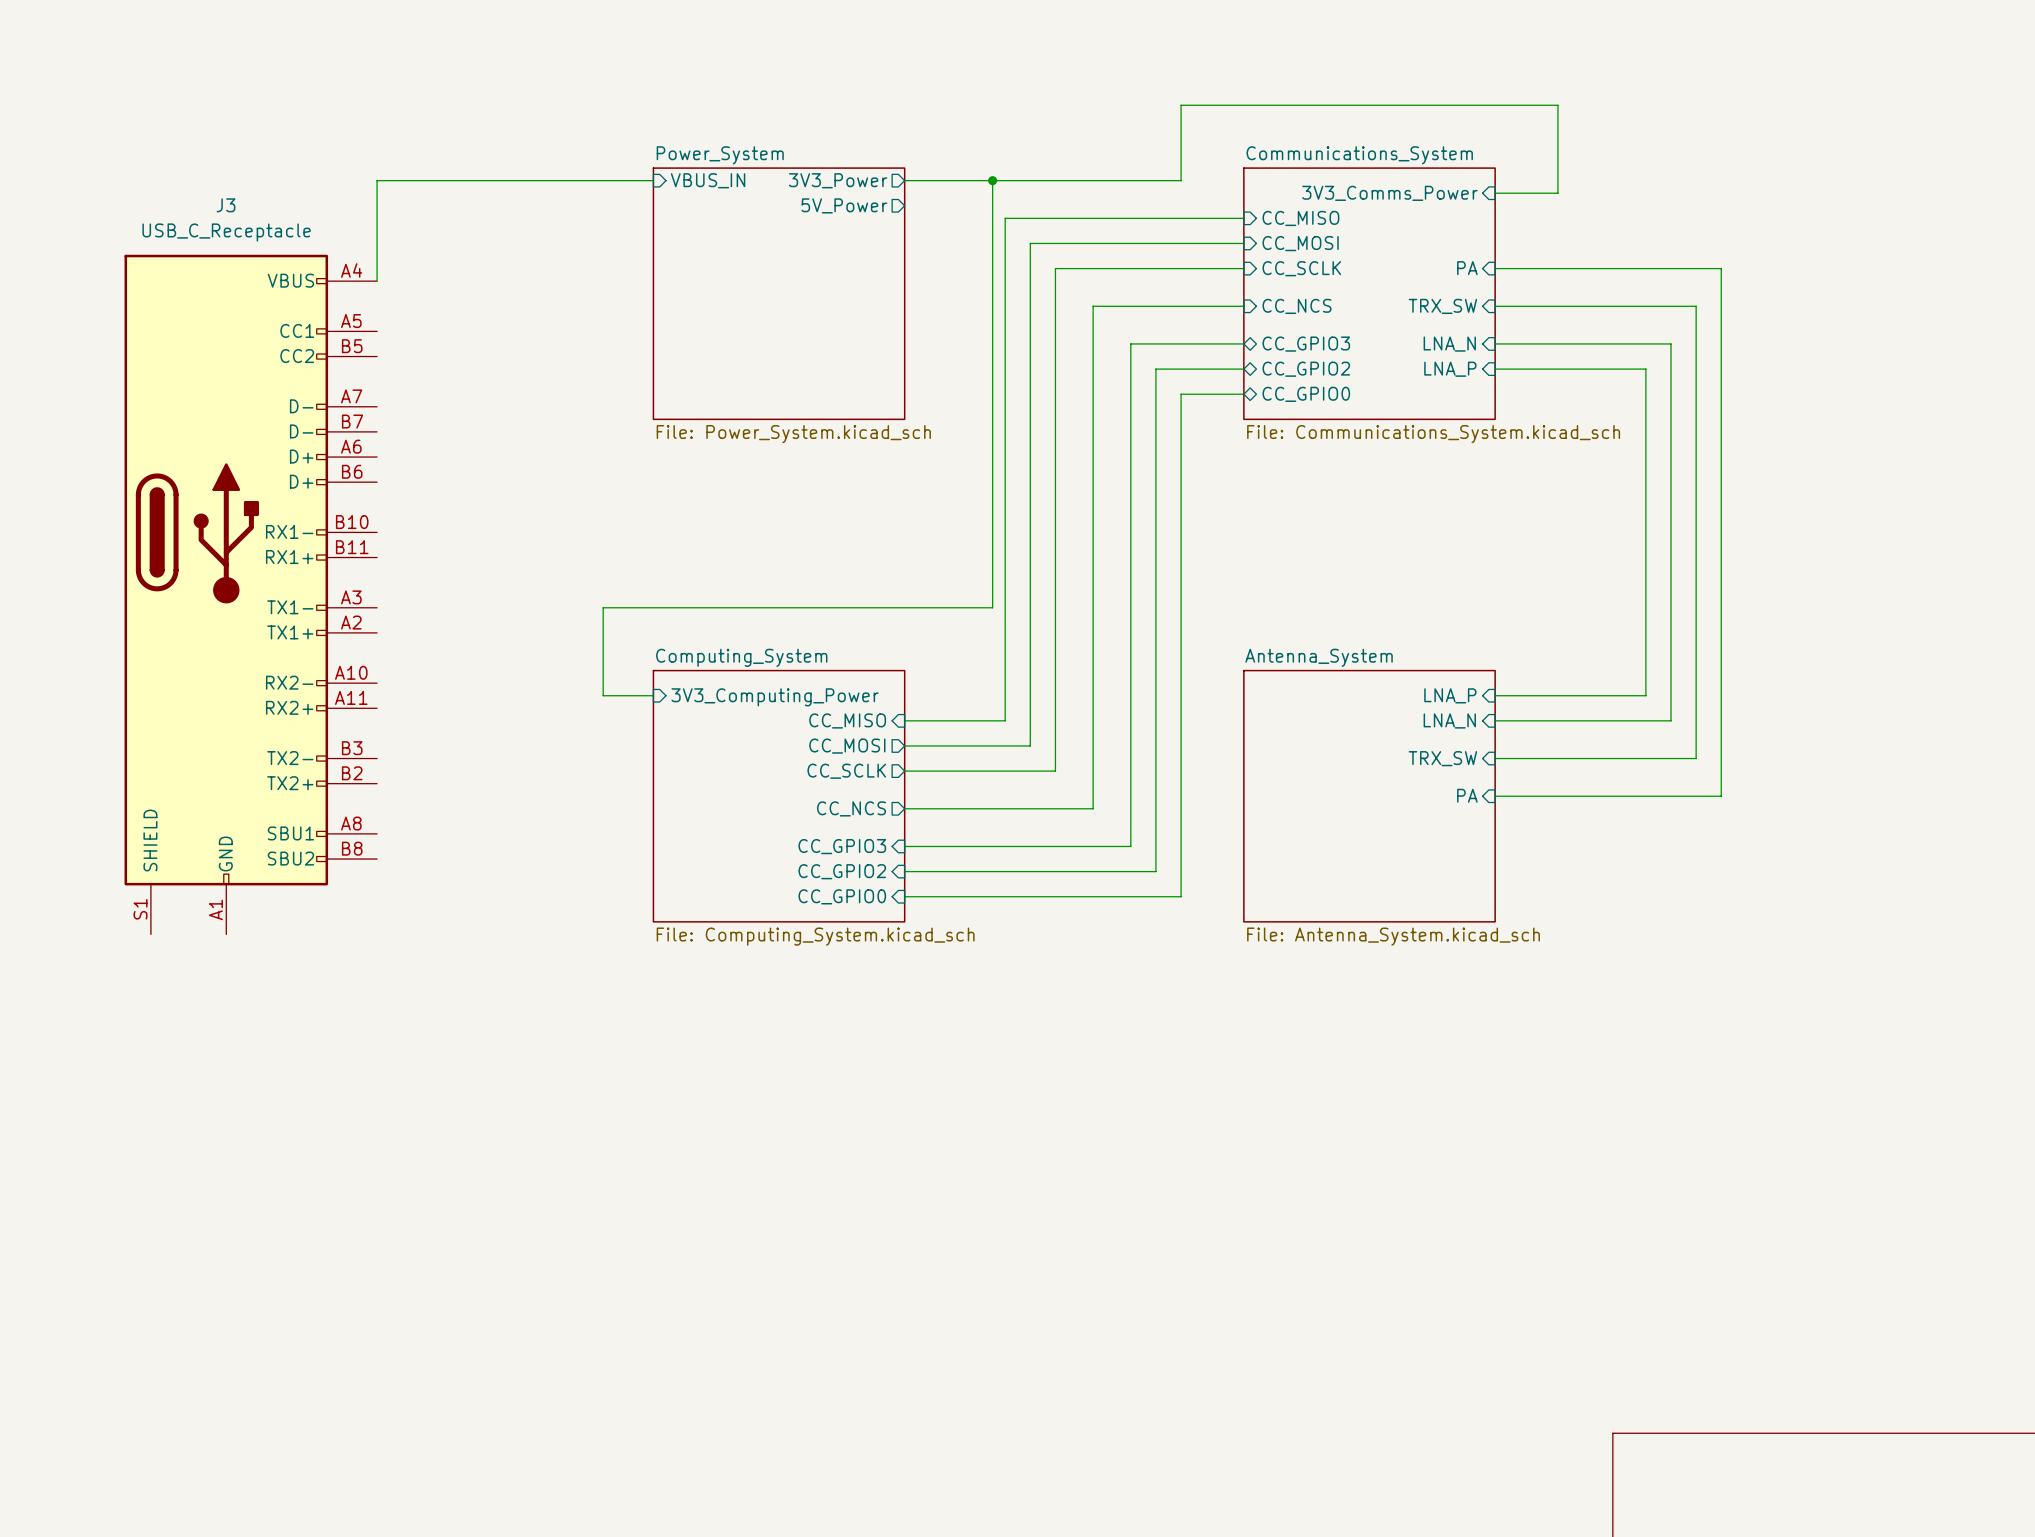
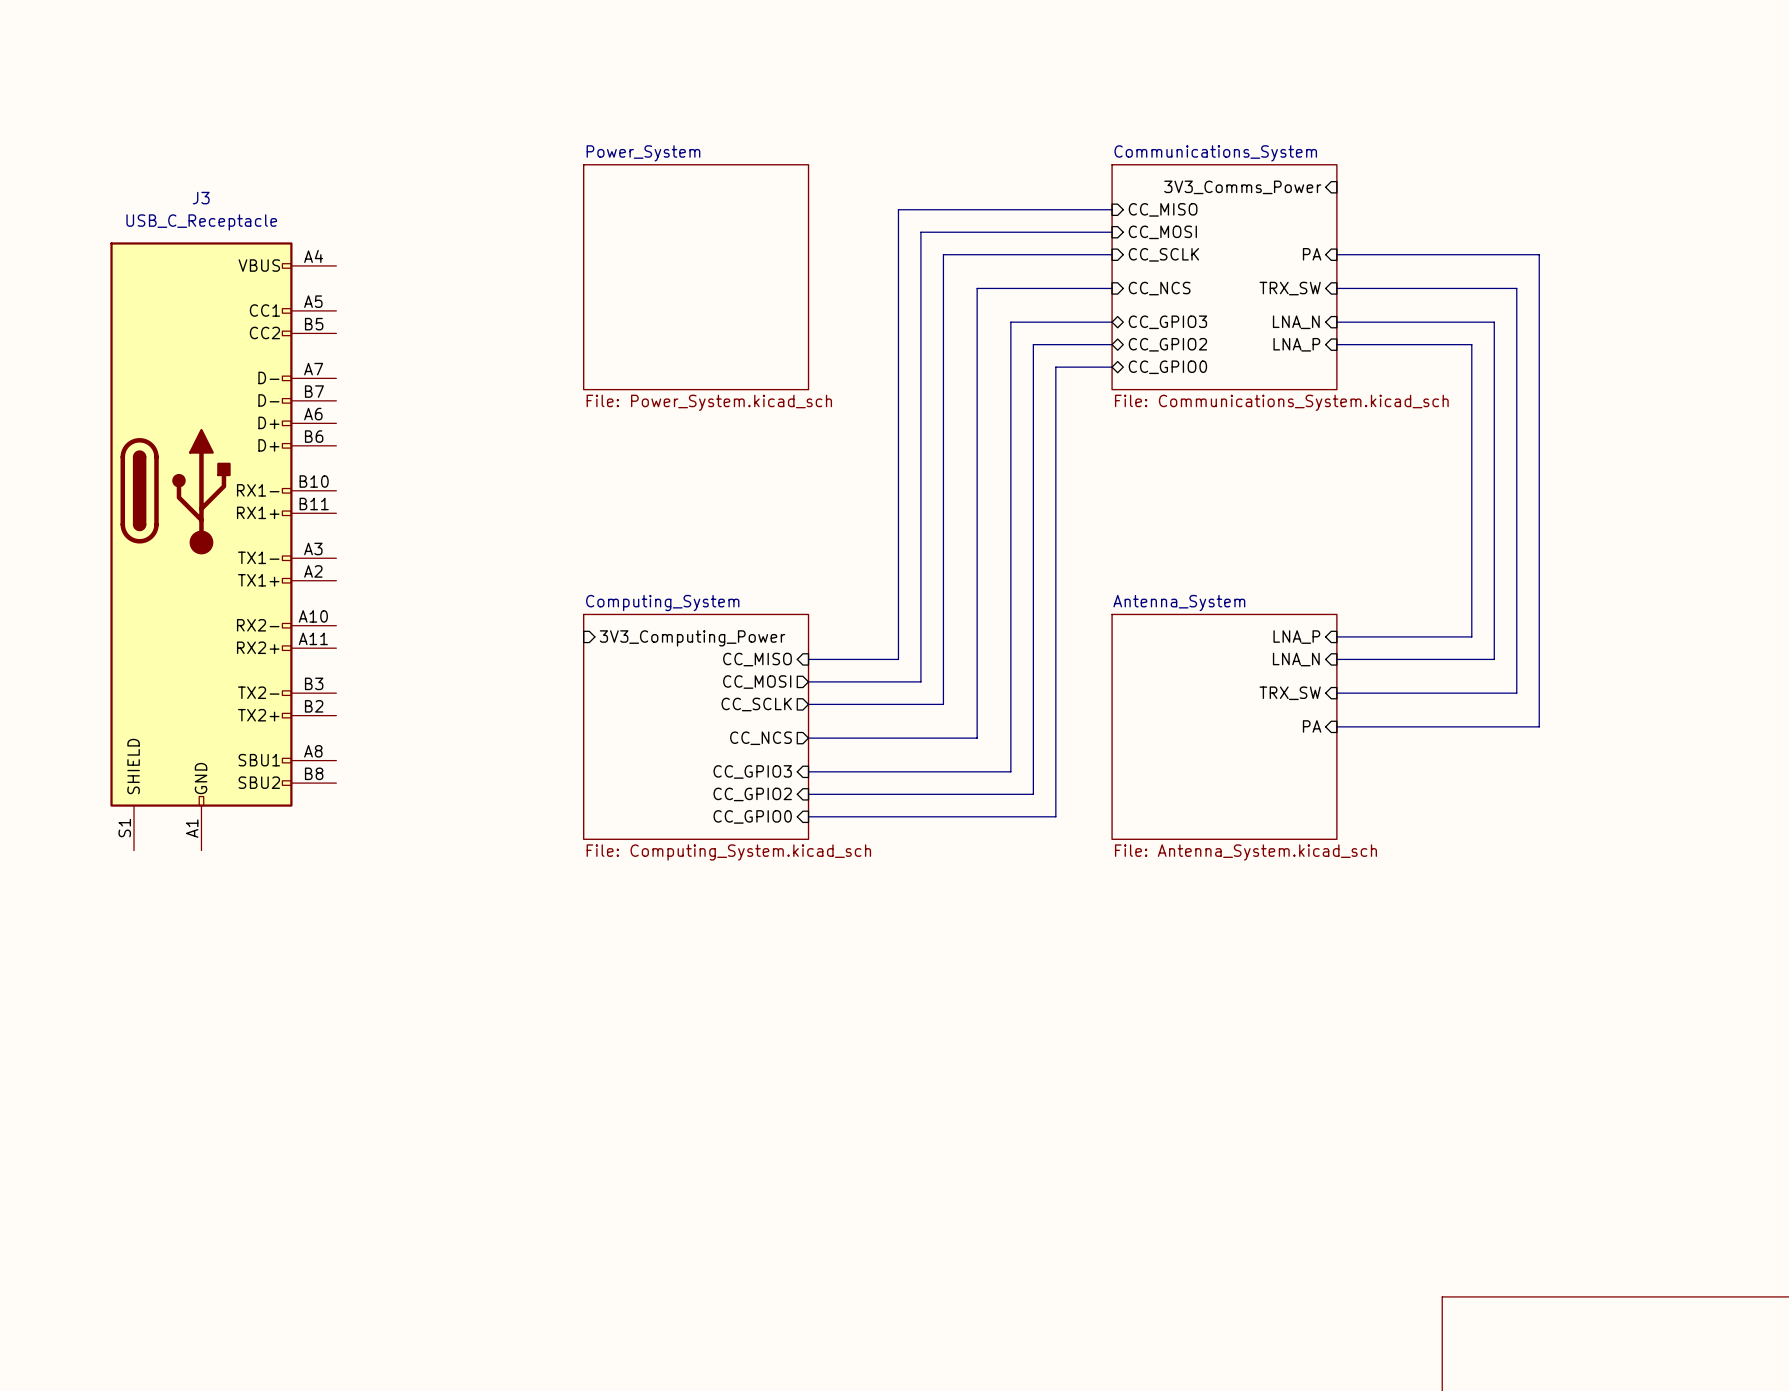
wire: (653, 180) (377, 180) (377, 281) -> none
sheet pin: VBUS_IN (708, 180) -> none
sheet pin: 3V3_Power (838, 180) -> none
wire: (904, 180) (1181, 180) (1181, 105) (1557, 105) (1557, 193) (1495, 193) -> none
wire: (992, 180) (992, 607) (603, 607) (603, 695) (653, 695) -> none
junction: (992, 180) -> none
sheet pin: 5V_Power (844, 205) -> none

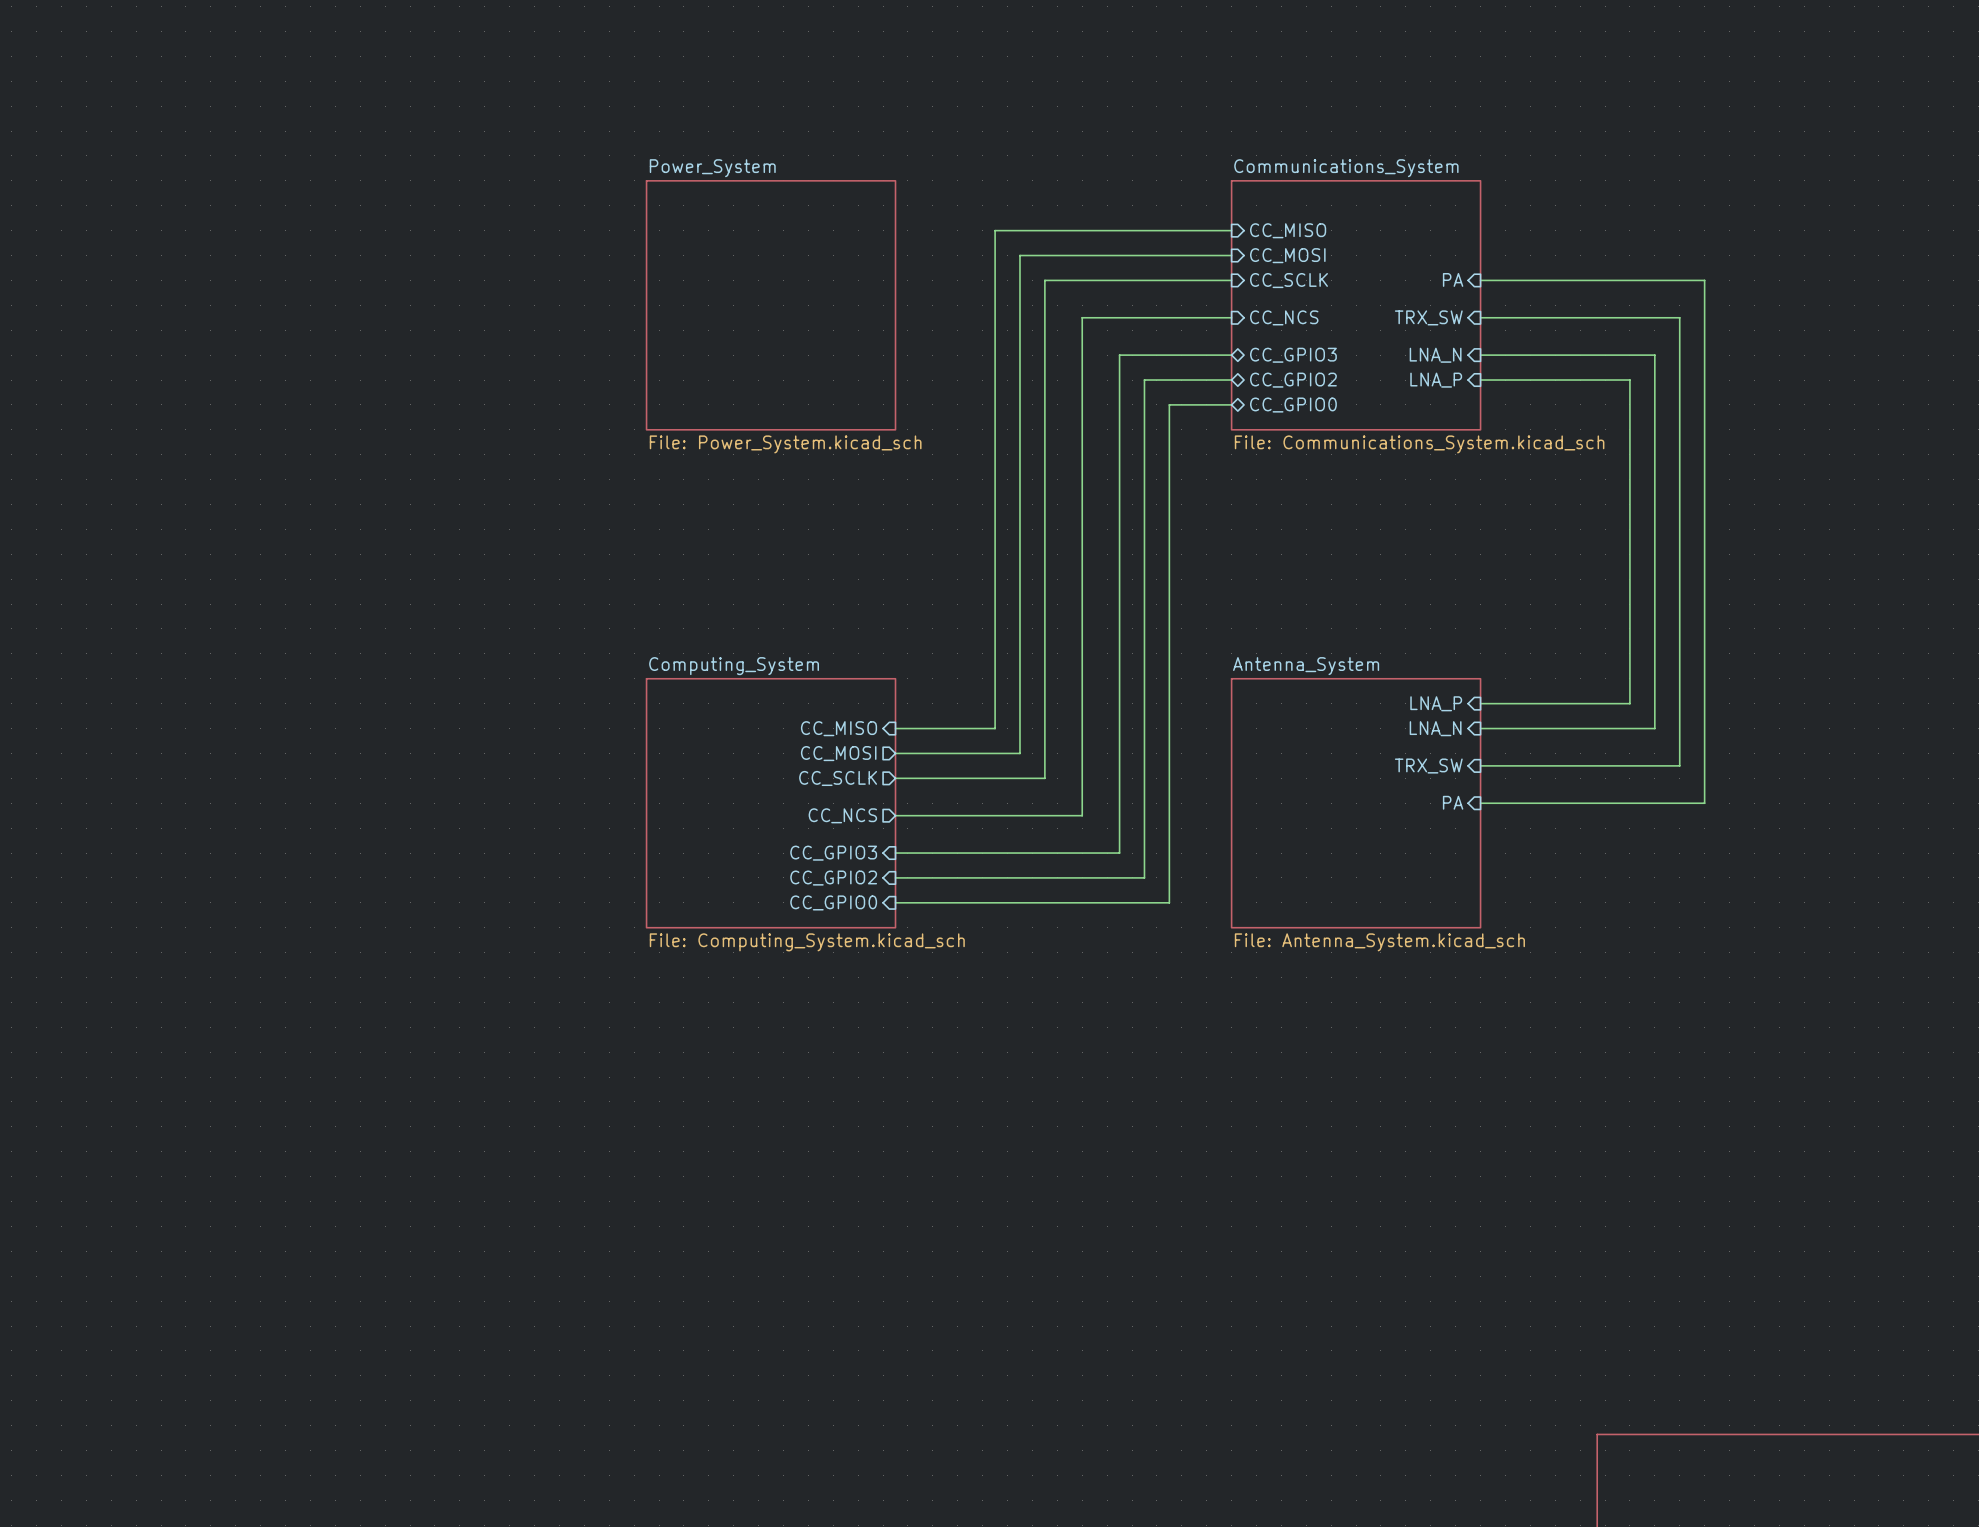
sheet pin: 3V3_Comms_Power (1242, 187) -> none
J3: USB_C_Receptacle (223, 546) -> none
sheet pin: 3V3_Computing_Power (692, 638) -> none

